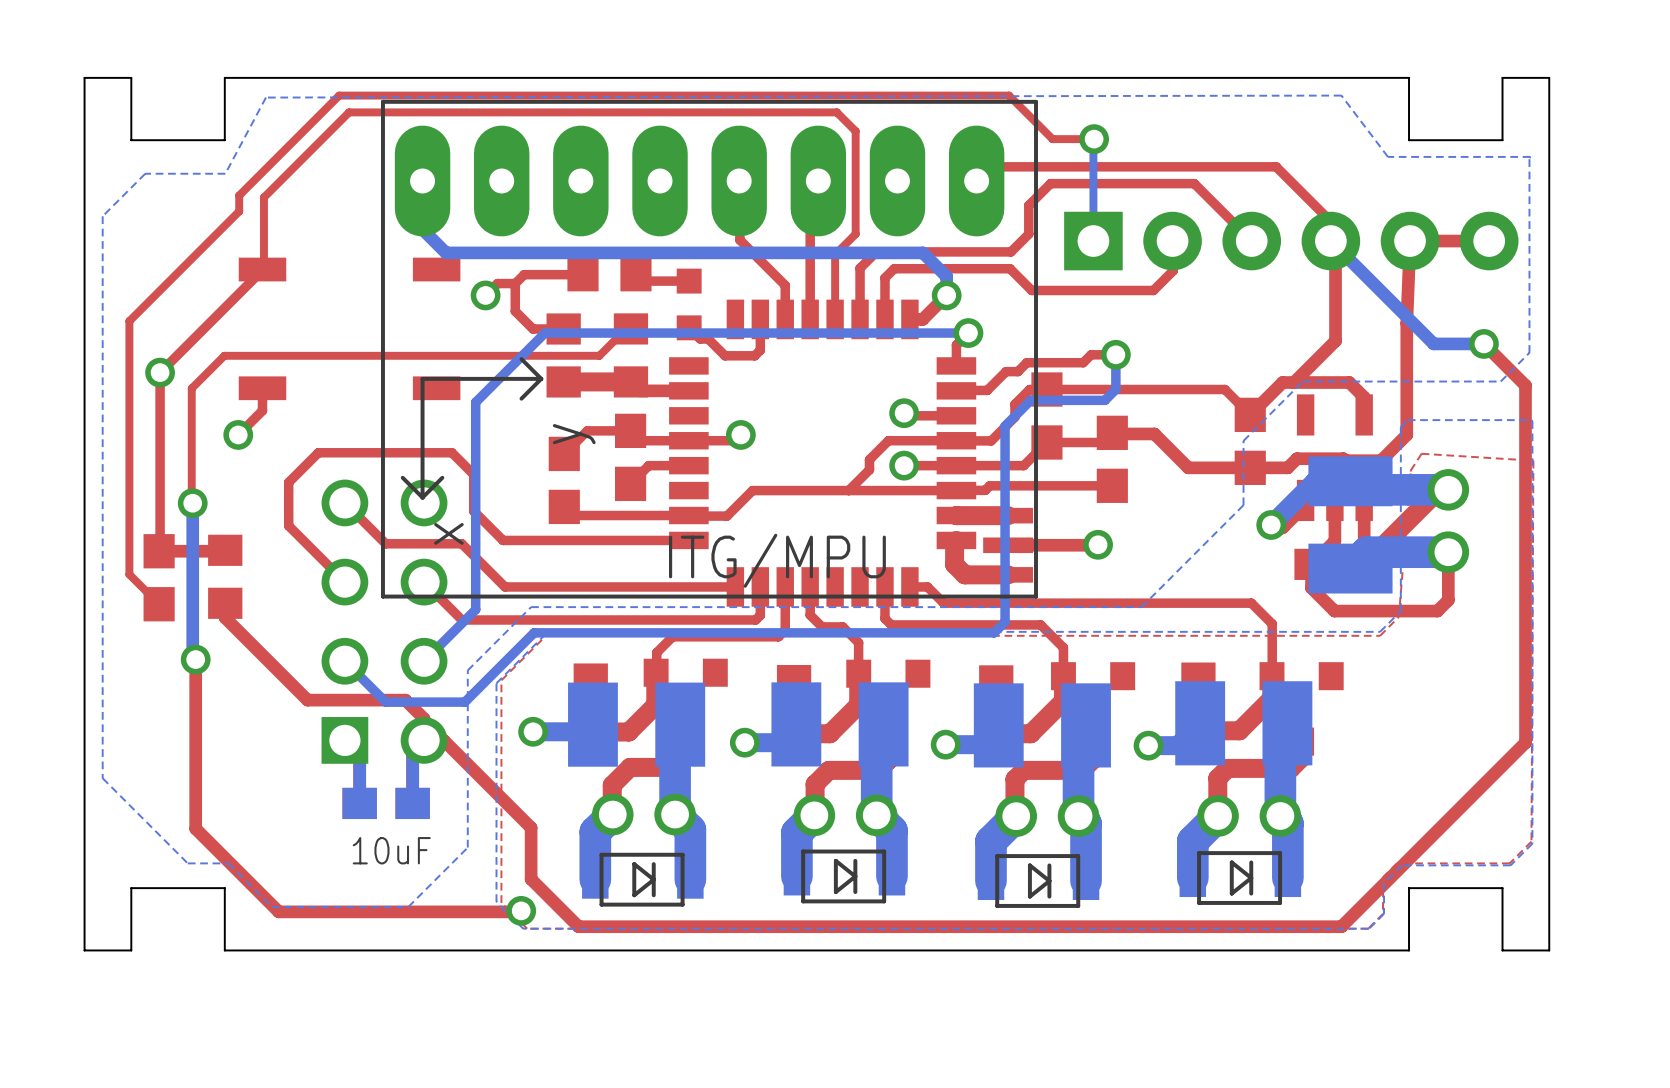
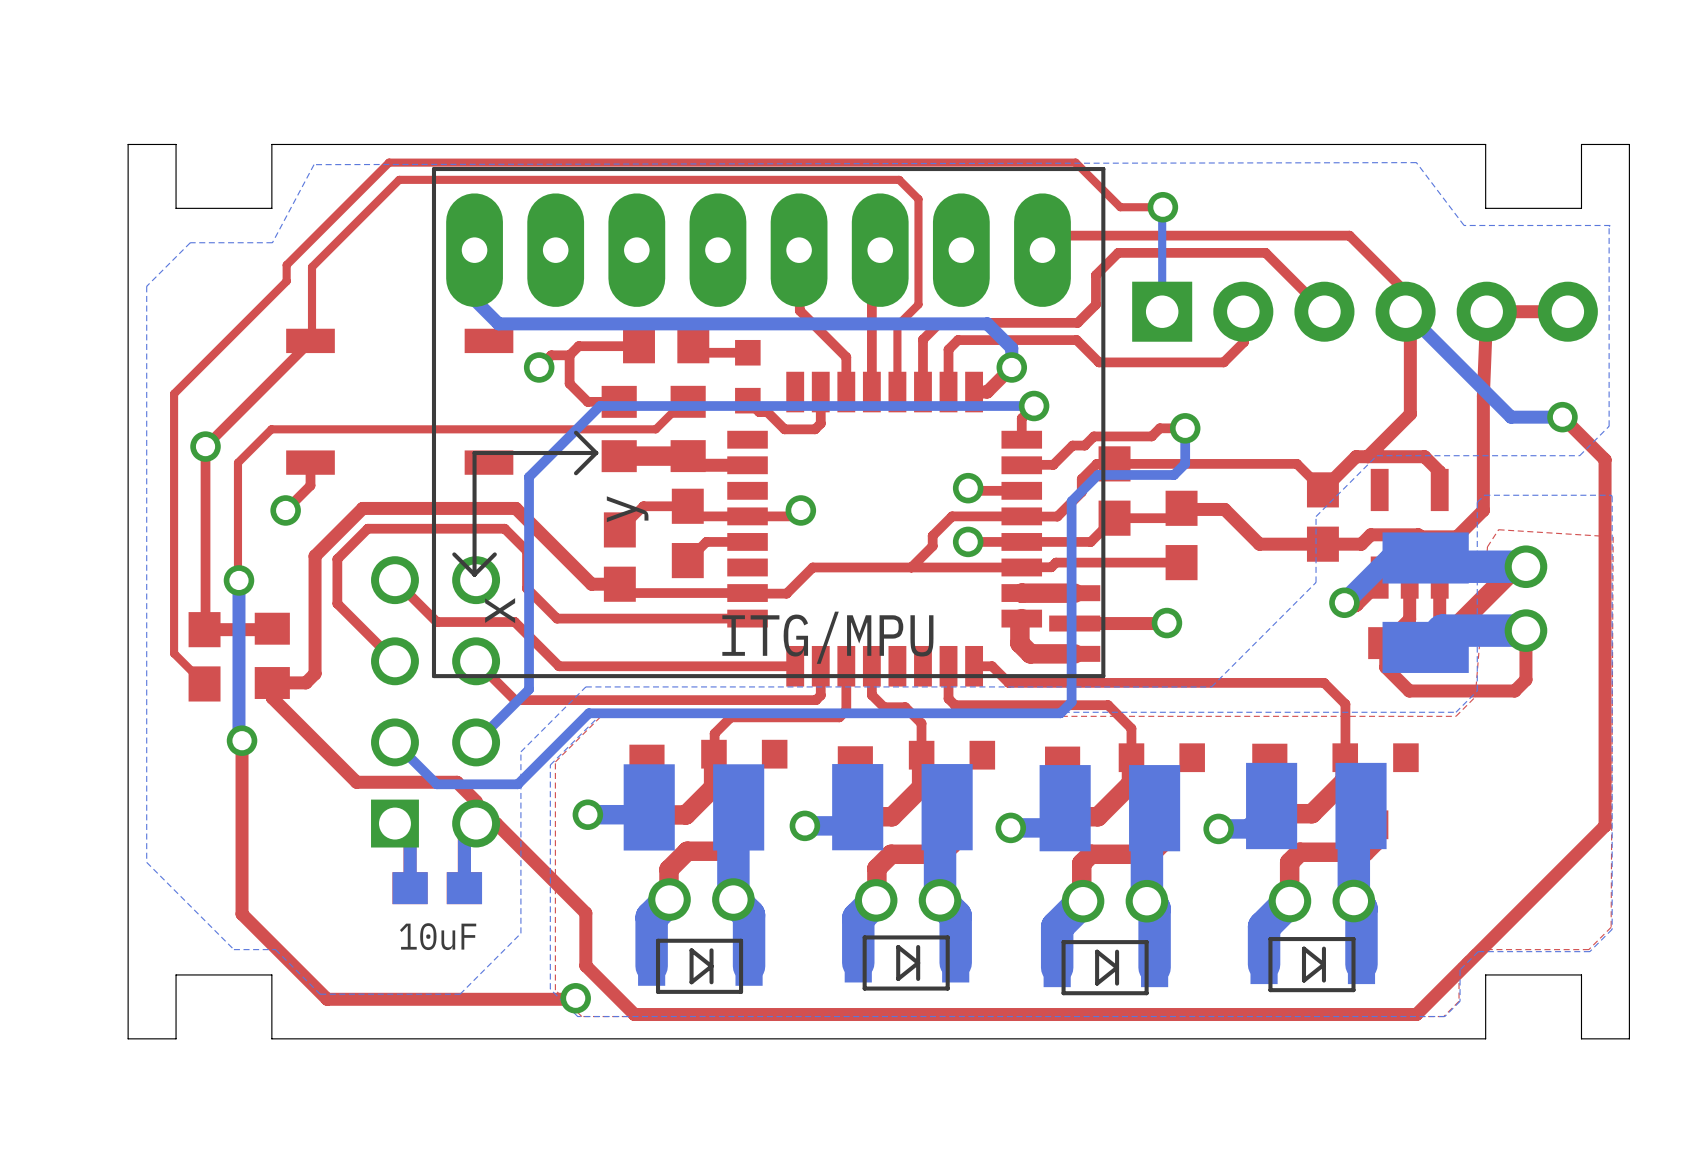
top track: none -> (619, 584) (591, 584) (515, 508) (362, 508) (315, 556) (315, 673) (305, 682) (272, 682)

